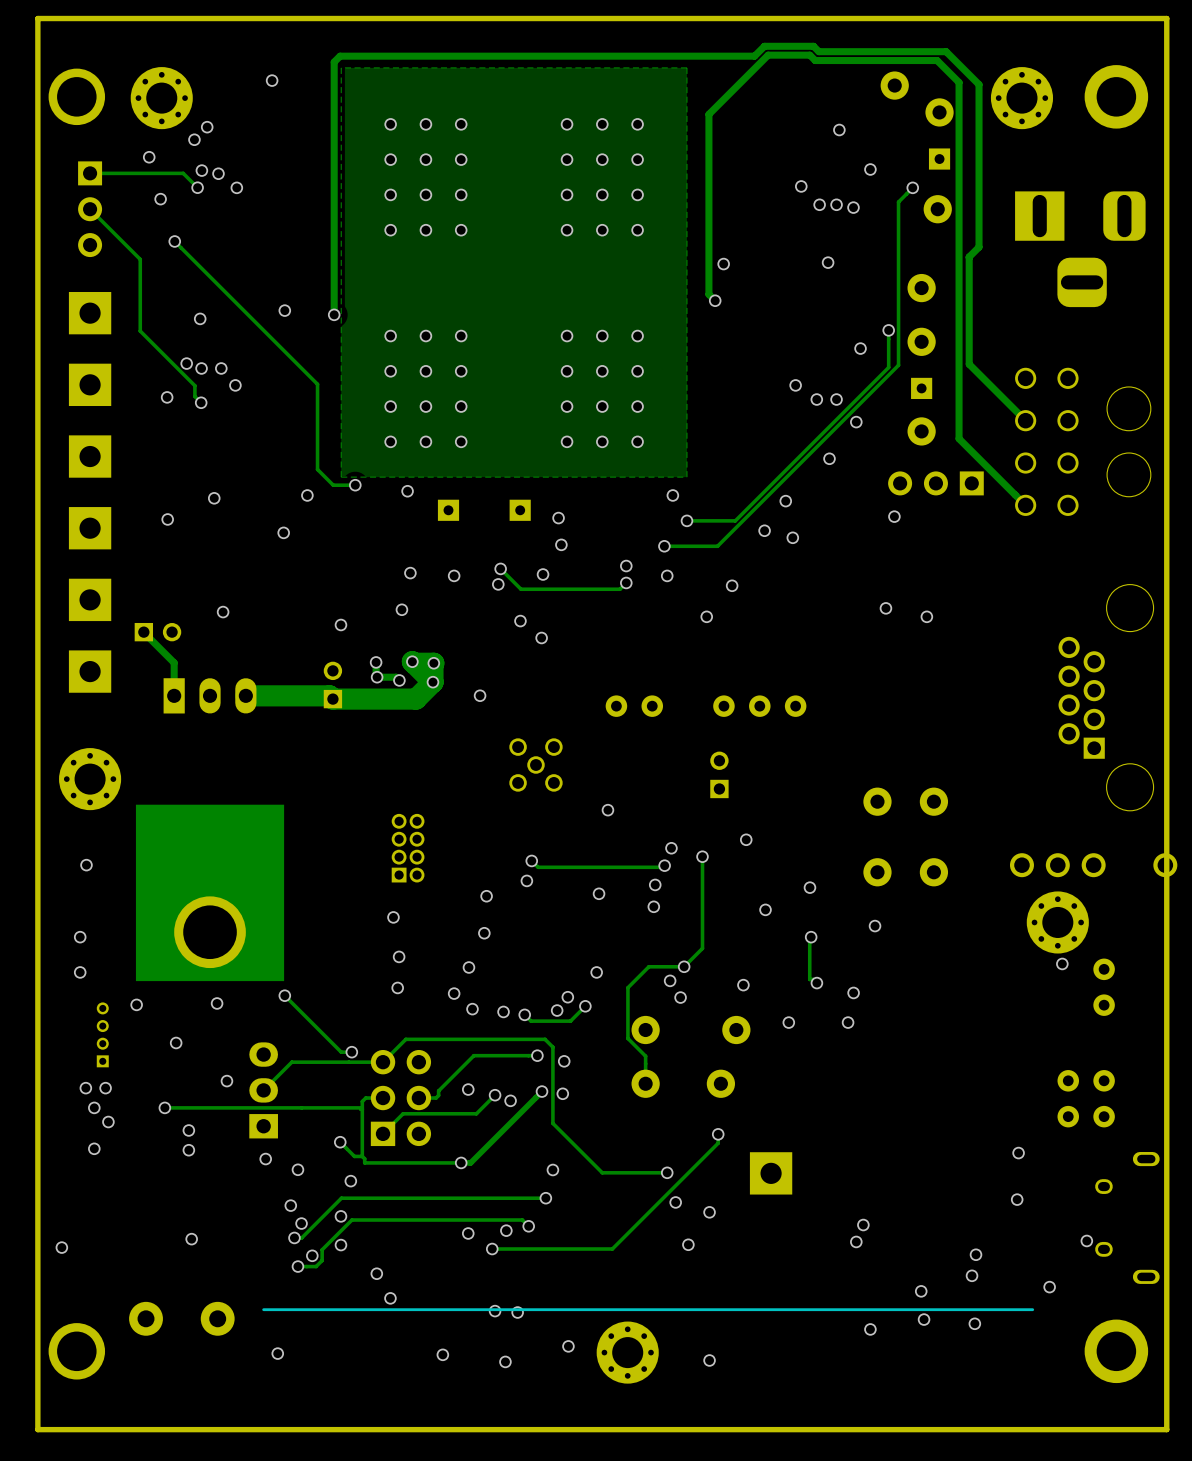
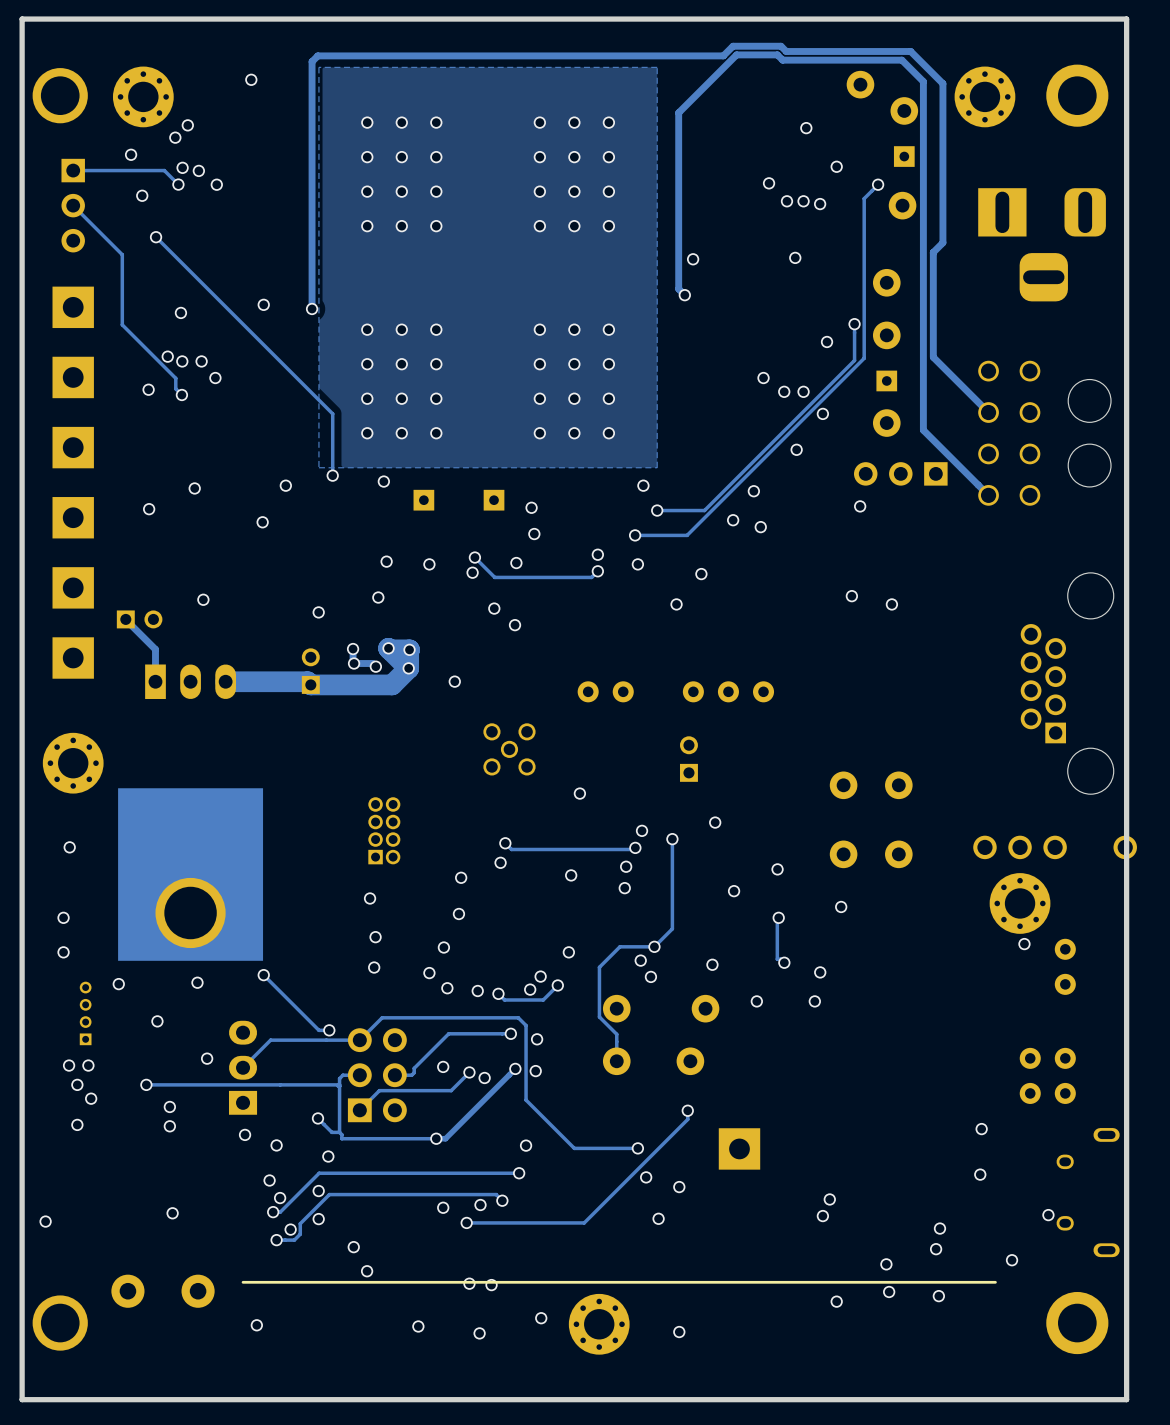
track: (317, 384) (317, 469) (333, 485) (355, 485) -> (295, 376) (332, 413) (332, 475)

